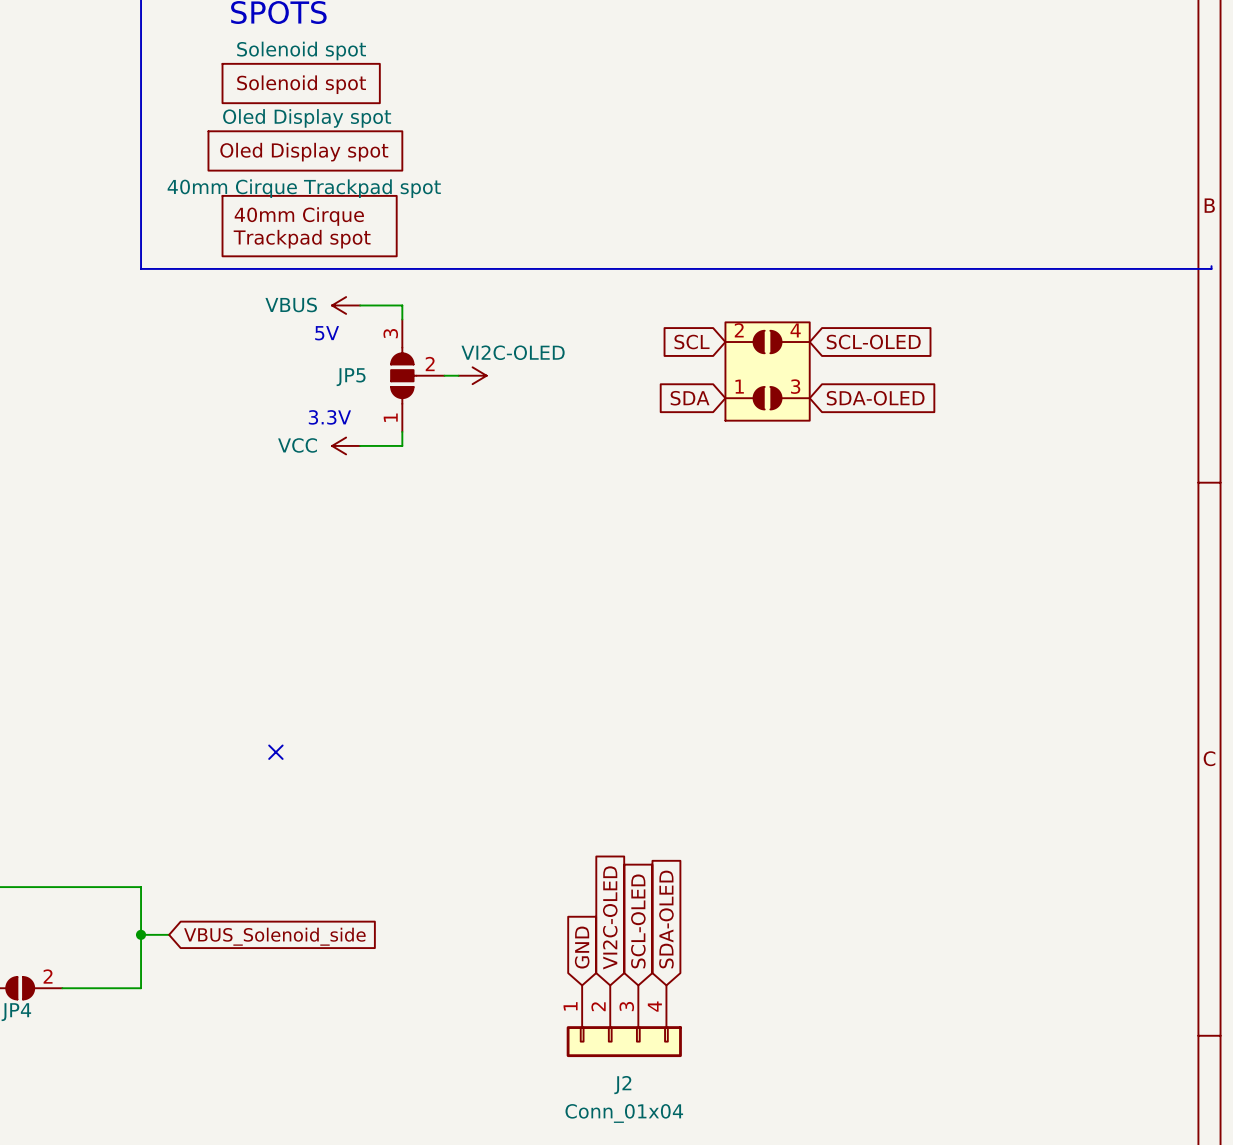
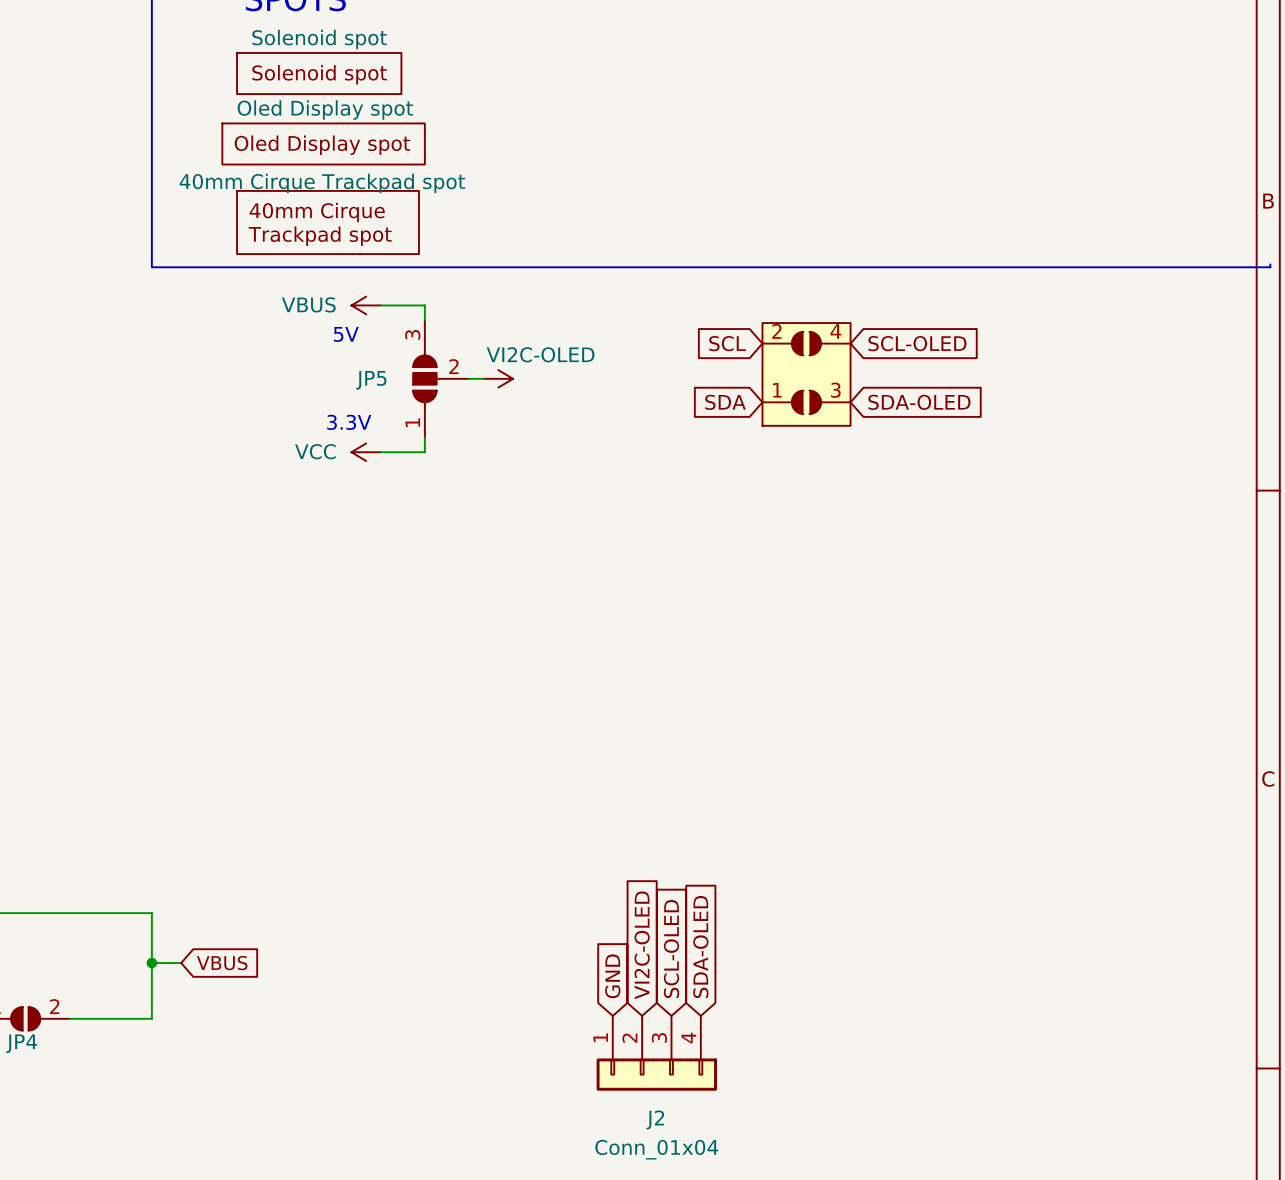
no-connect mark: (275, 752) -> none
global label: VBUS_Solenoid_side (274, 936) -> VBUS (222, 963)

